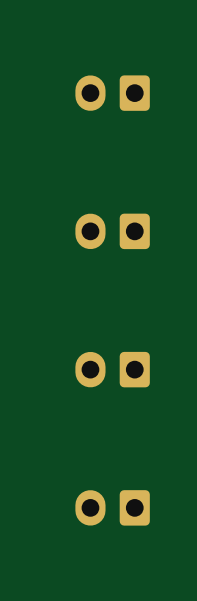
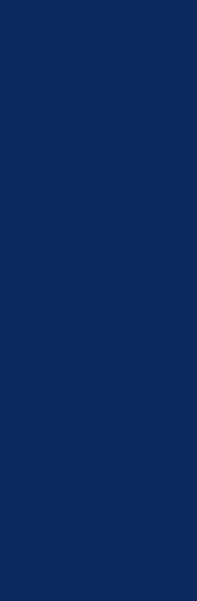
part: (112, 93) -> none
part: (112, 231) -> none
part: (112, 369) -> none
part: (112, 507) -> none

